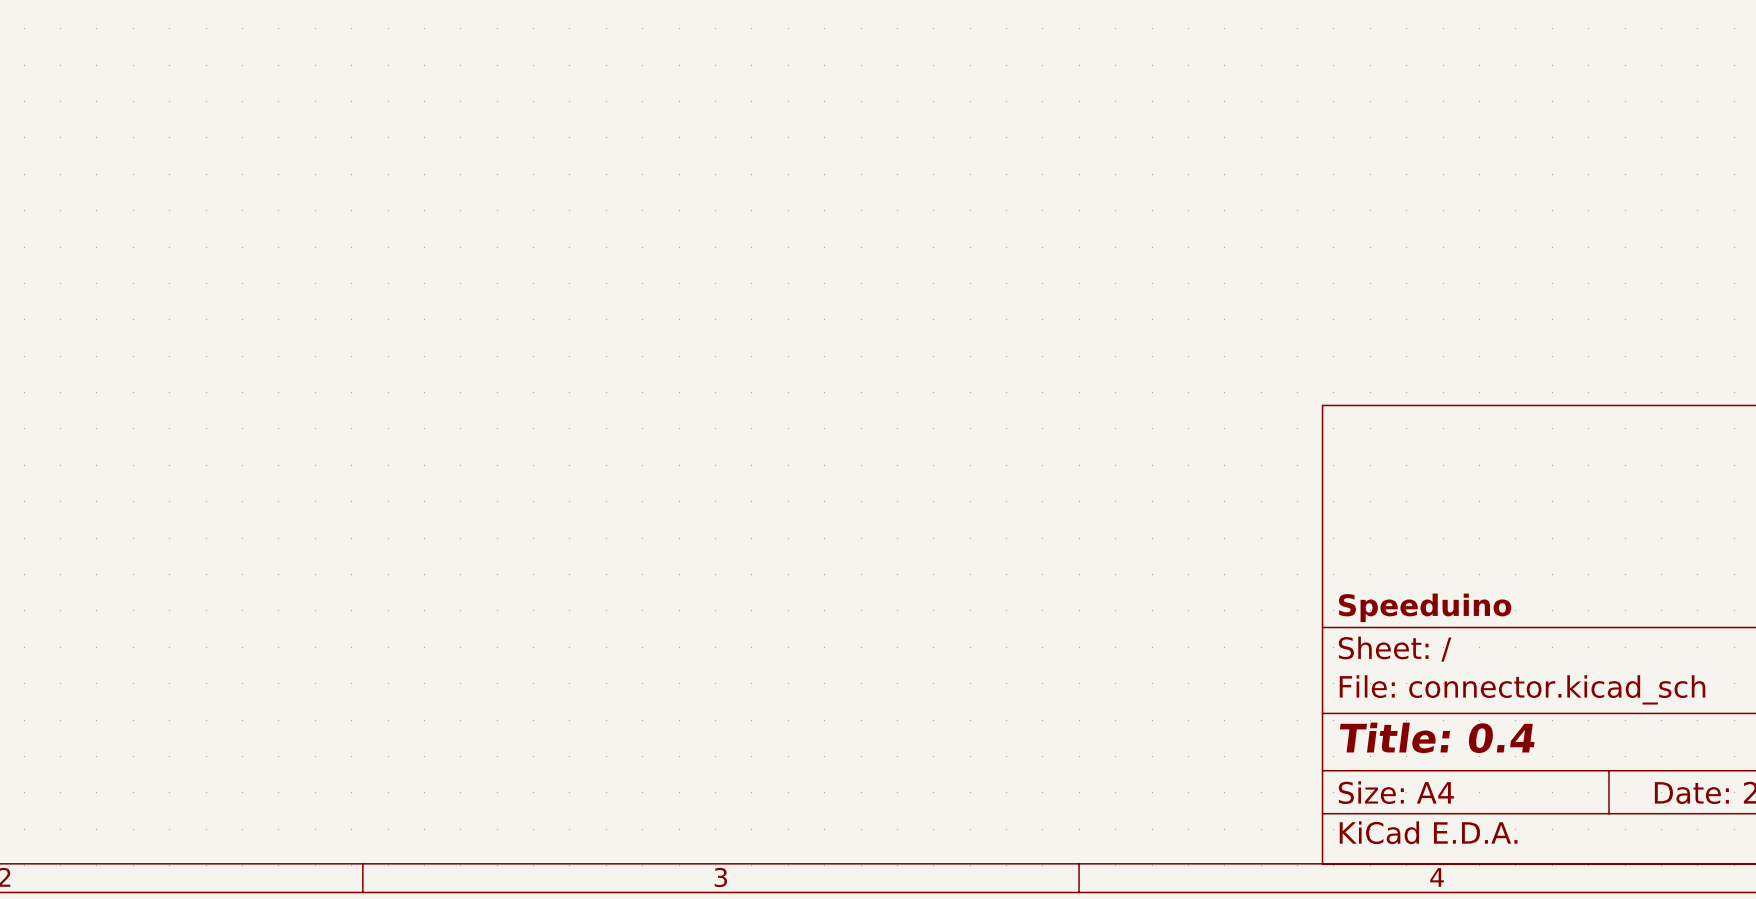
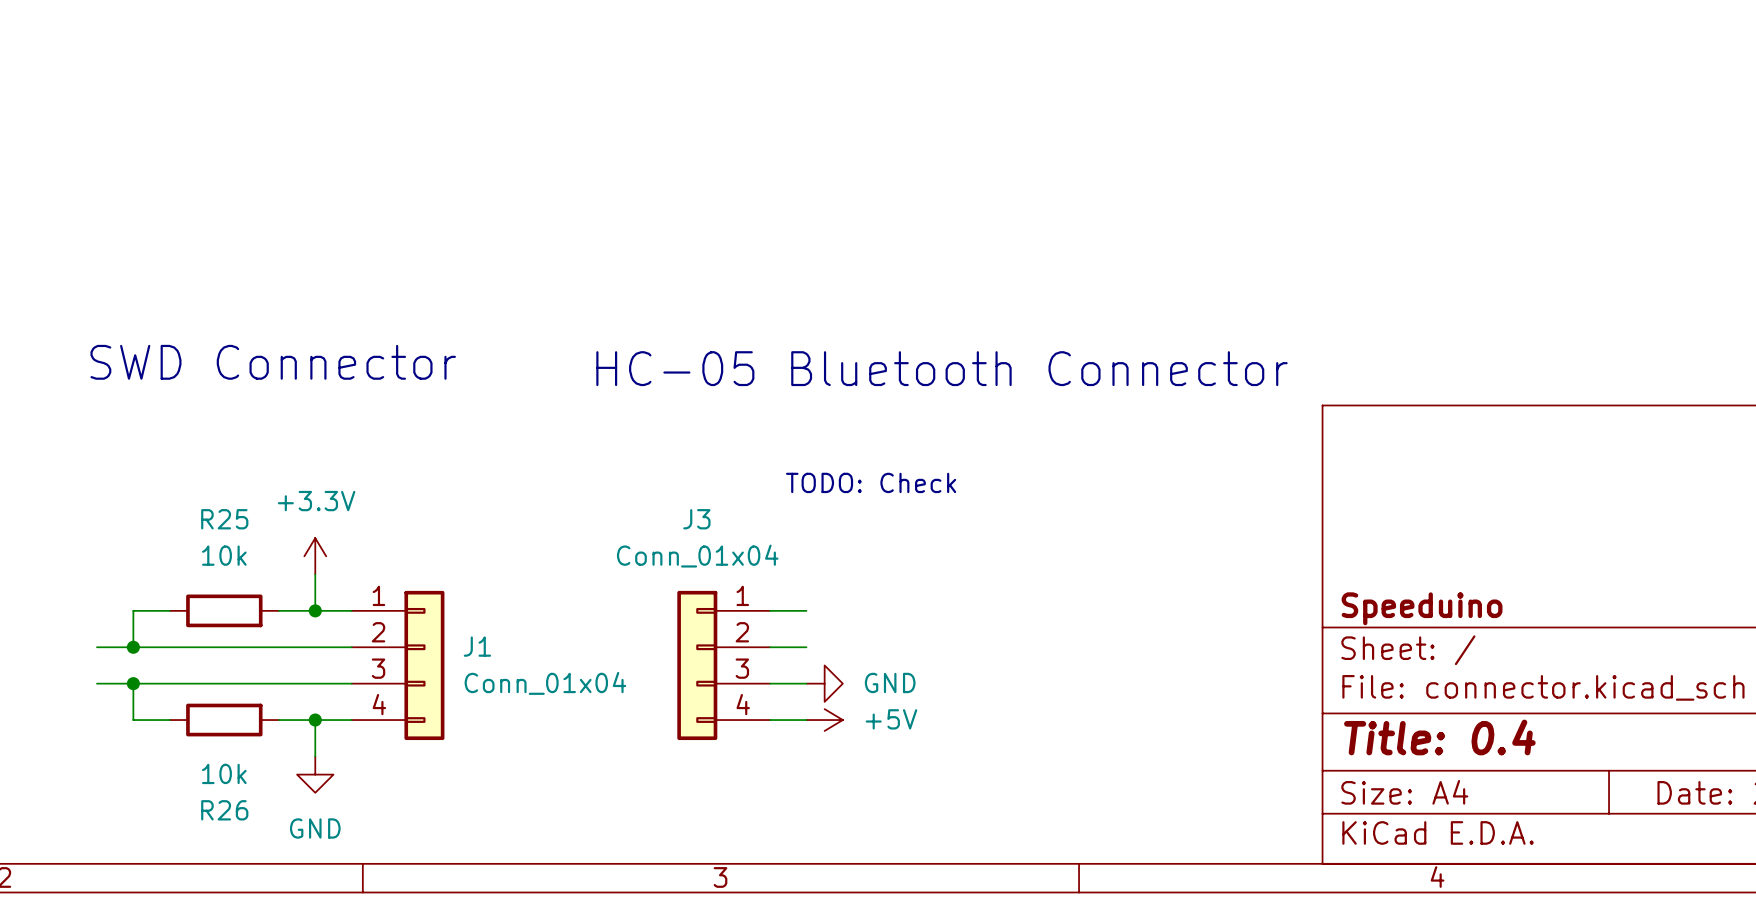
text: none -> SWD Connector (273, 362)
text: none -> HC-05 Bluetooth Connector (941, 368)
text: none -> TODO: Check (871, 482)
power symbol: none -> +3.3V (315, 556)
wire: none -> (315, 574) (315, 610)
wire: none -> (169, 610) (133, 610) (133, 647)
R25: none -> 10k (224, 610)
wire: none -> (278, 610) (351, 610)
junction: none -> (315, 610)
wire: none -> (770, 610) (806, 610)
wire: none -> (96, 647) (351, 647)
junction: none -> (133, 647)
wire: none -> (770, 647) (806, 647)
J1: none -> Conn_01x04 (398, 665)
J3: none -> Conn_01x04 (723, 665)
wire: none -> (96, 683) (351, 683)
wire: none -> (133, 683) (133, 720) (169, 720)
junction: none -> (133, 683)
wire: none -> (770, 683) (806, 683)
power symbol: none -> GND (824, 683)
R26: none -> 10k (224, 720)
wire: none -> (278, 720) (351, 720)
wire: none -> (315, 720) (315, 756)
junction: none -> (315, 720)
wire: none -> (770, 720) (806, 720)
power symbol: none -> +5V (824, 720)
power symbol: none -> GND (315, 774)

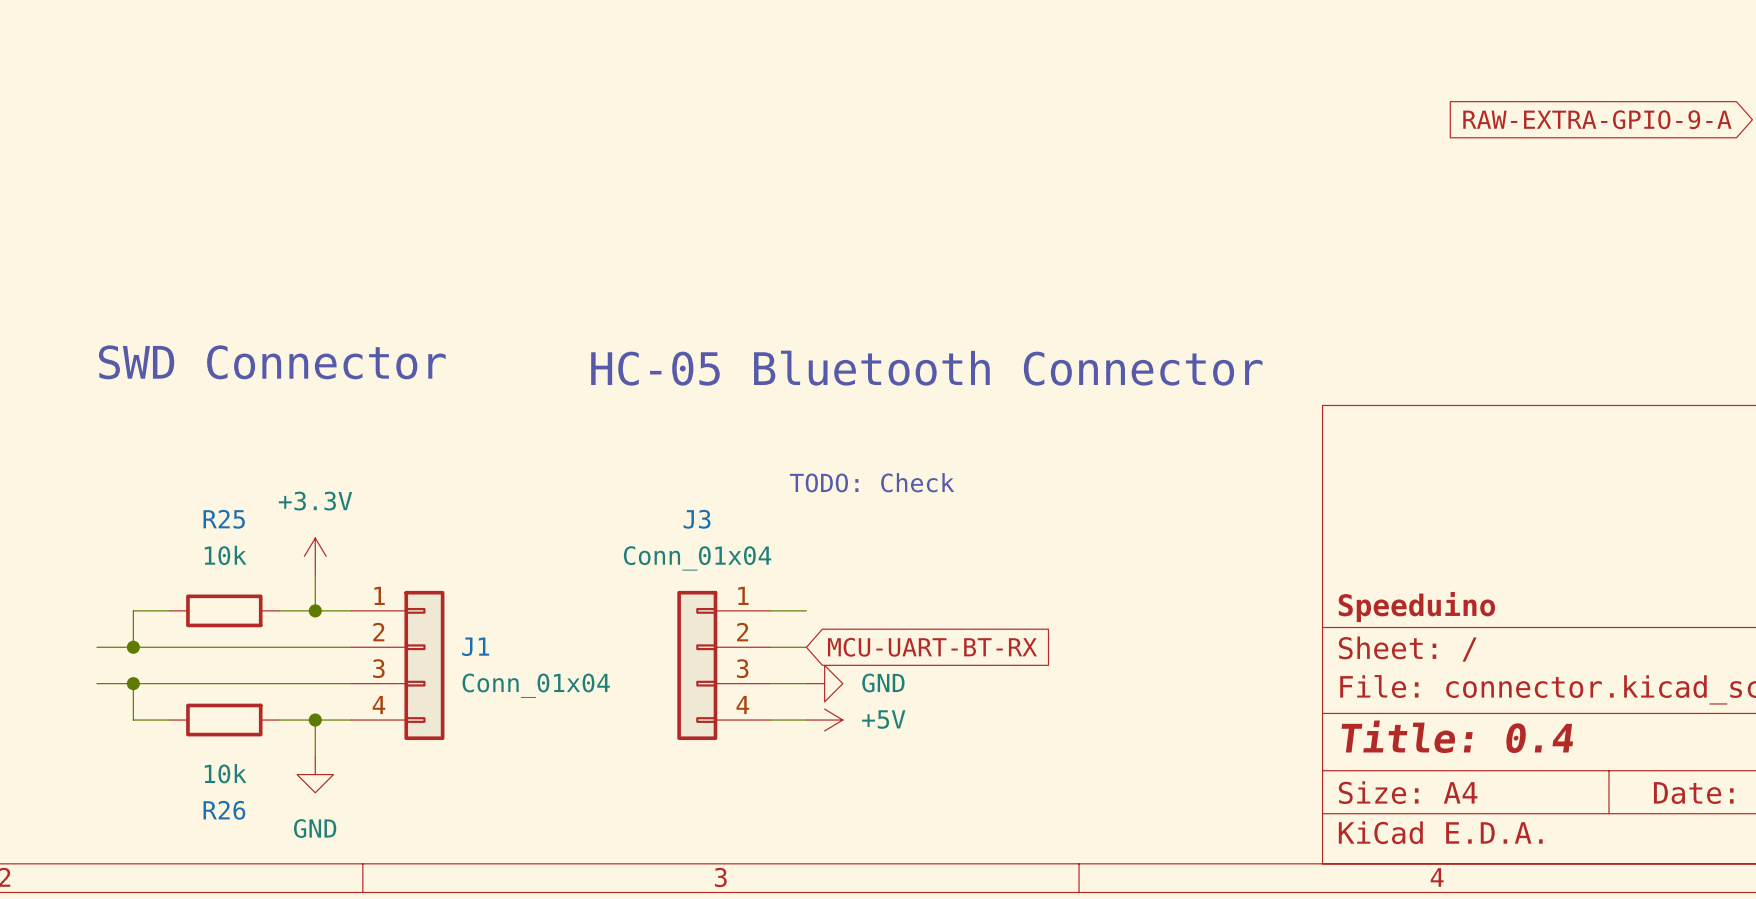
global label: none -> RAW-EXTRA-GPIO-9-A (1597, 119)
global label: none -> MCU-UART-BT-RX (932, 647)

